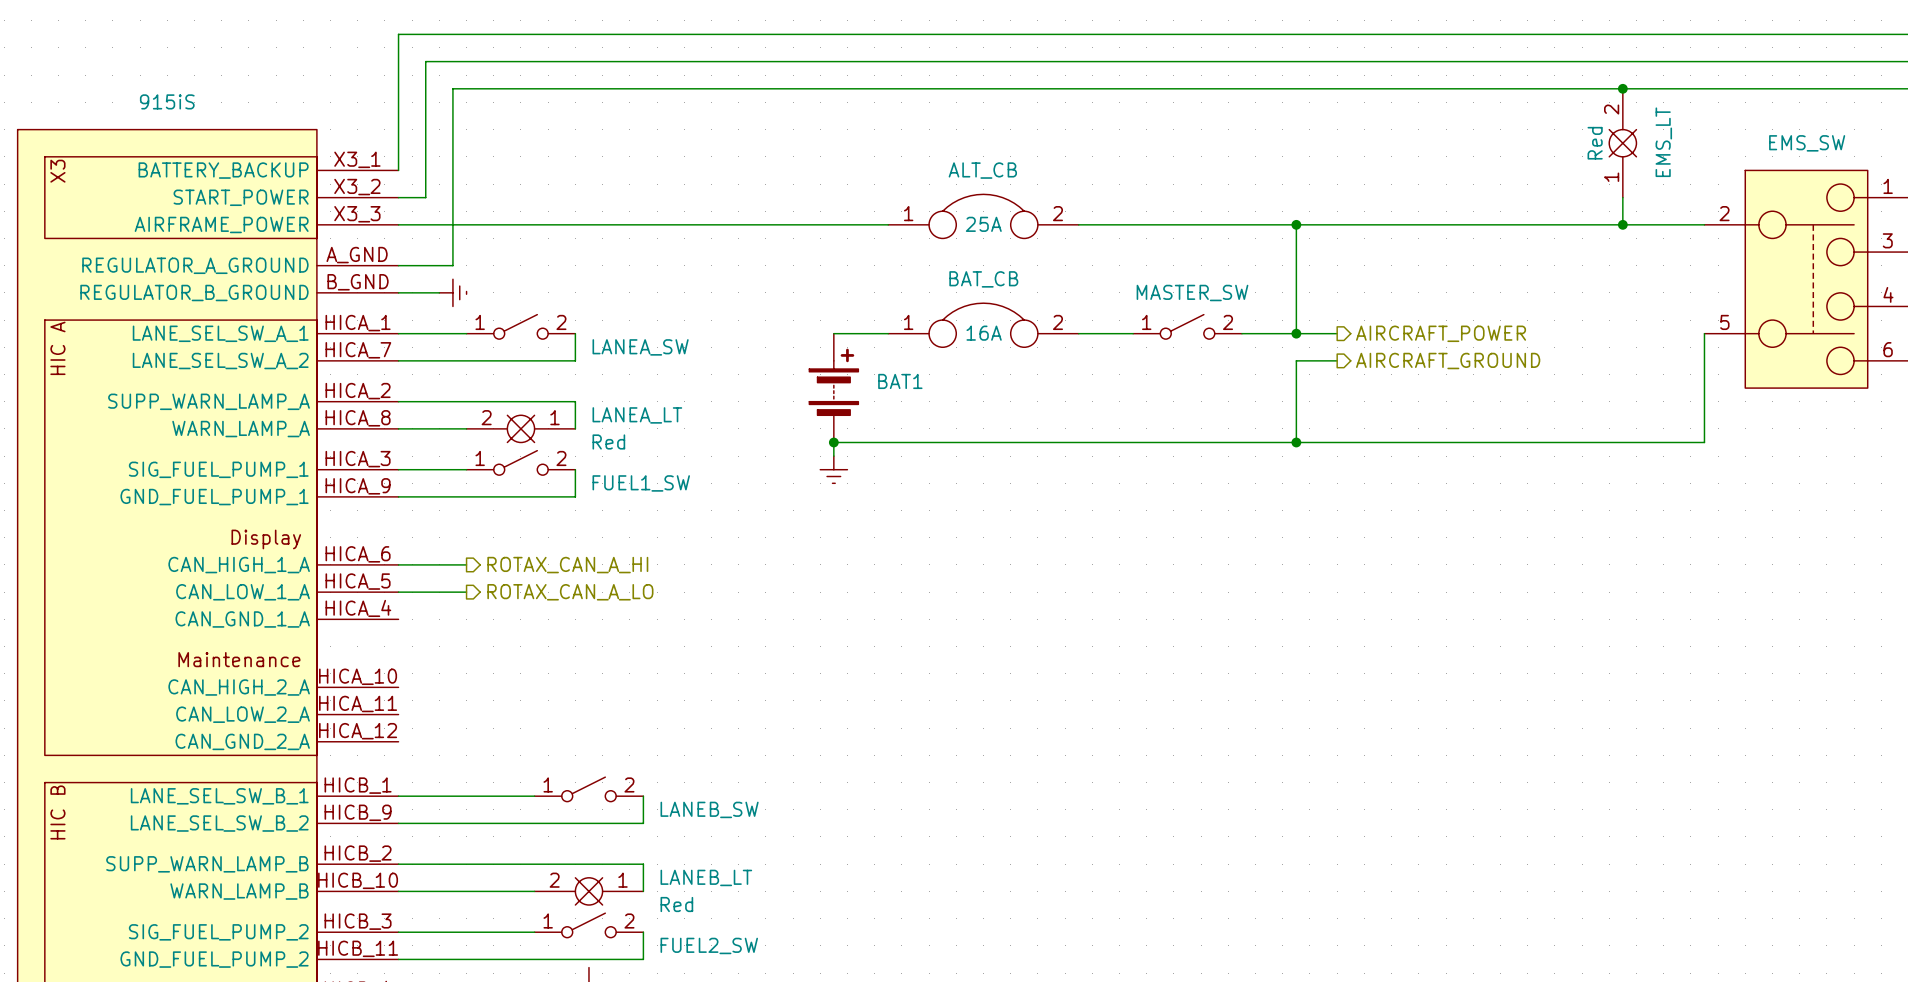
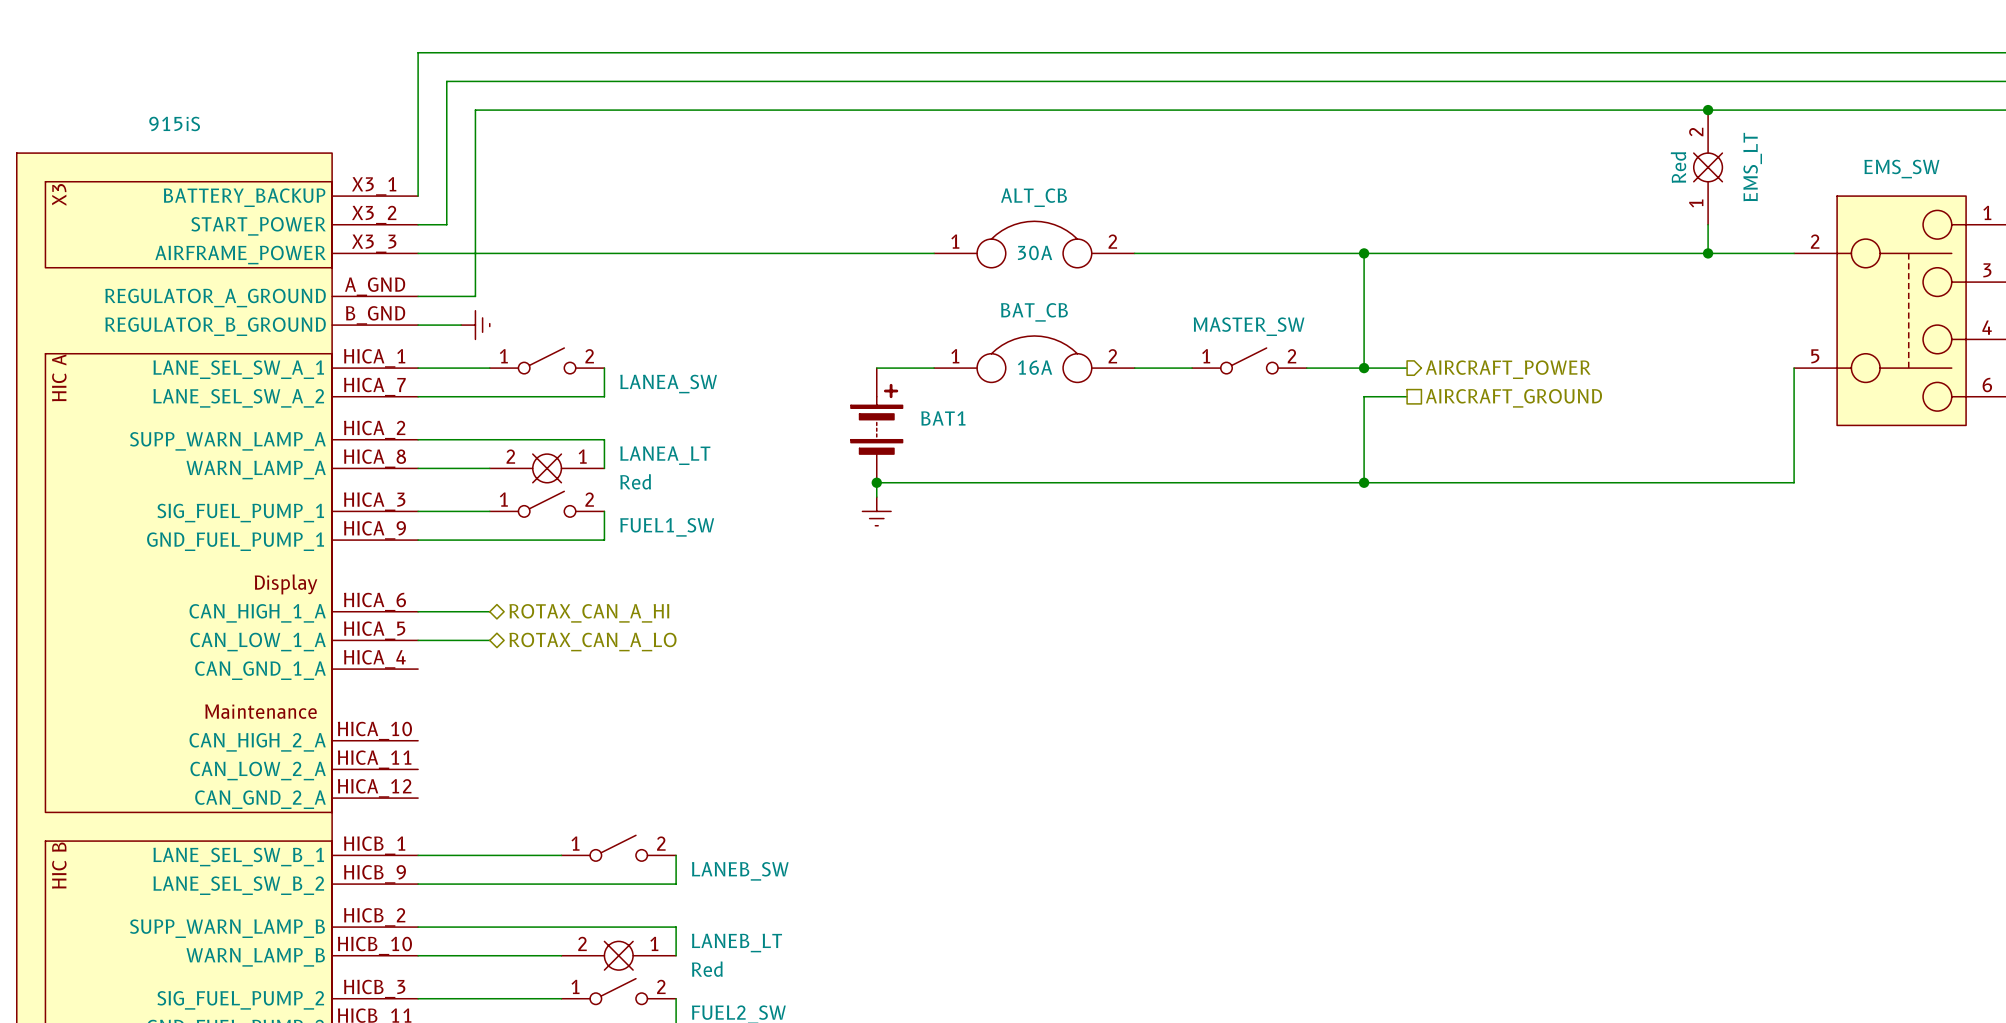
ALT_CB value: 25A (983, 224) -> 30A (1035, 252)
hierarchical label shape: output (1448, 361) -> passive (1513, 398)
hierarchical label shape: output (567, 565) -> bidirectional (589, 613)
hierarchical label shape: output (570, 592) -> bidirectional (592, 642)

